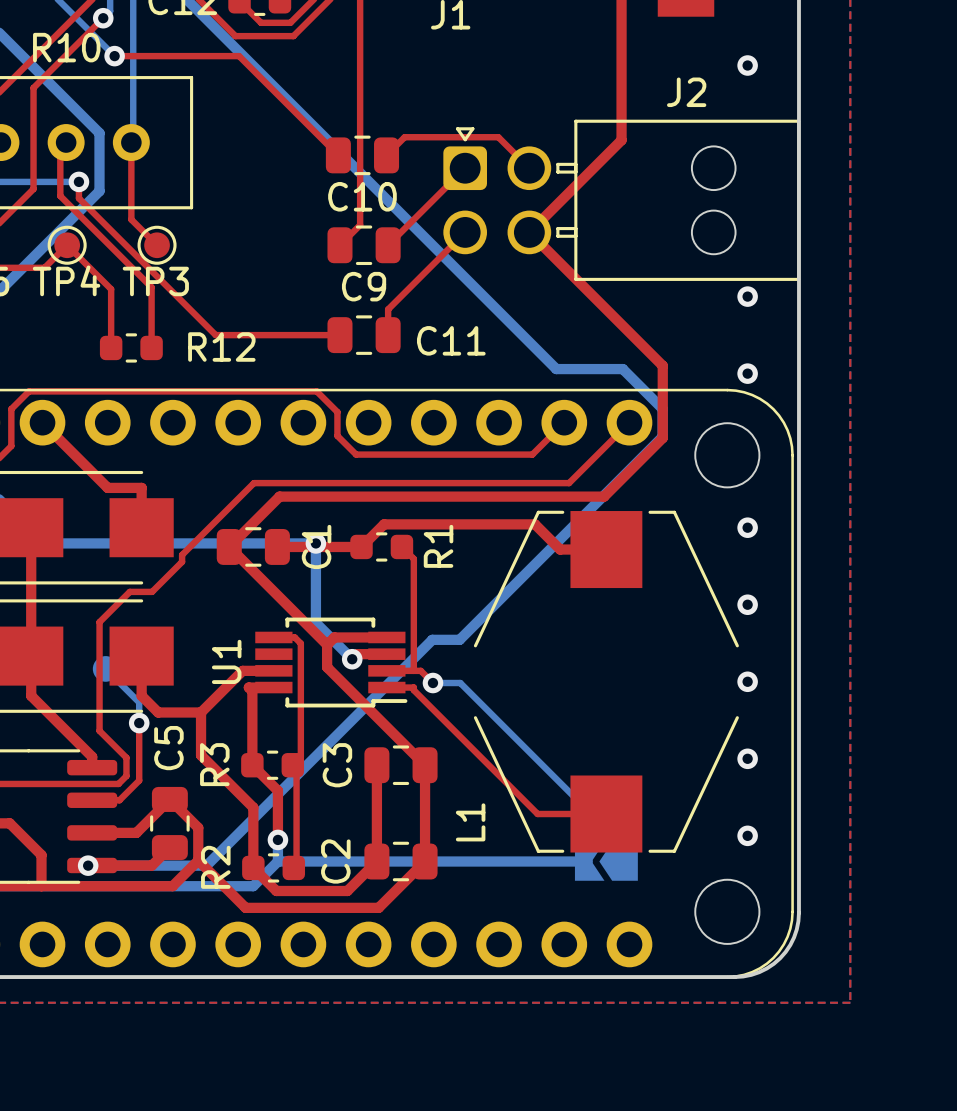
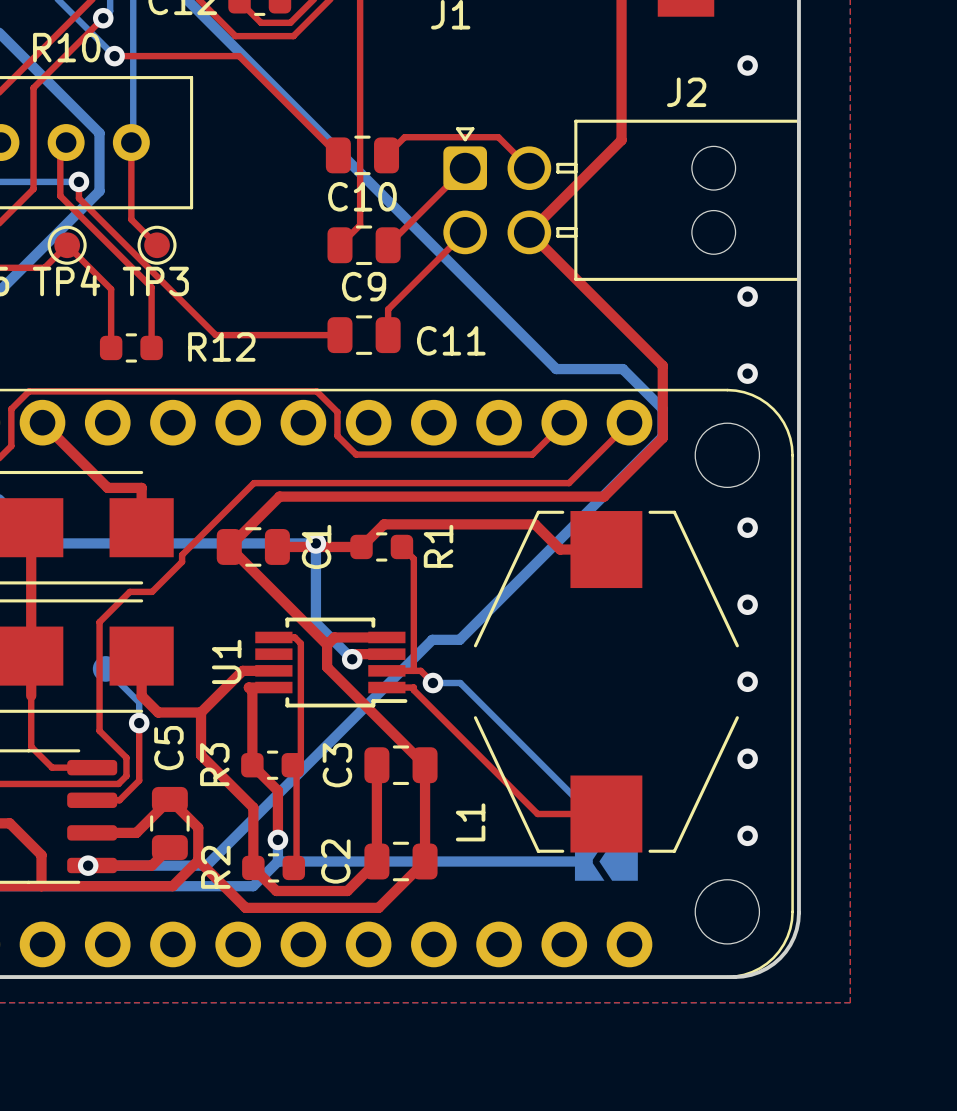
top track: (31, 695) (92, 756) (92, 767) -> (31, 695) (31, 746) (52, 767) (92, 767)

